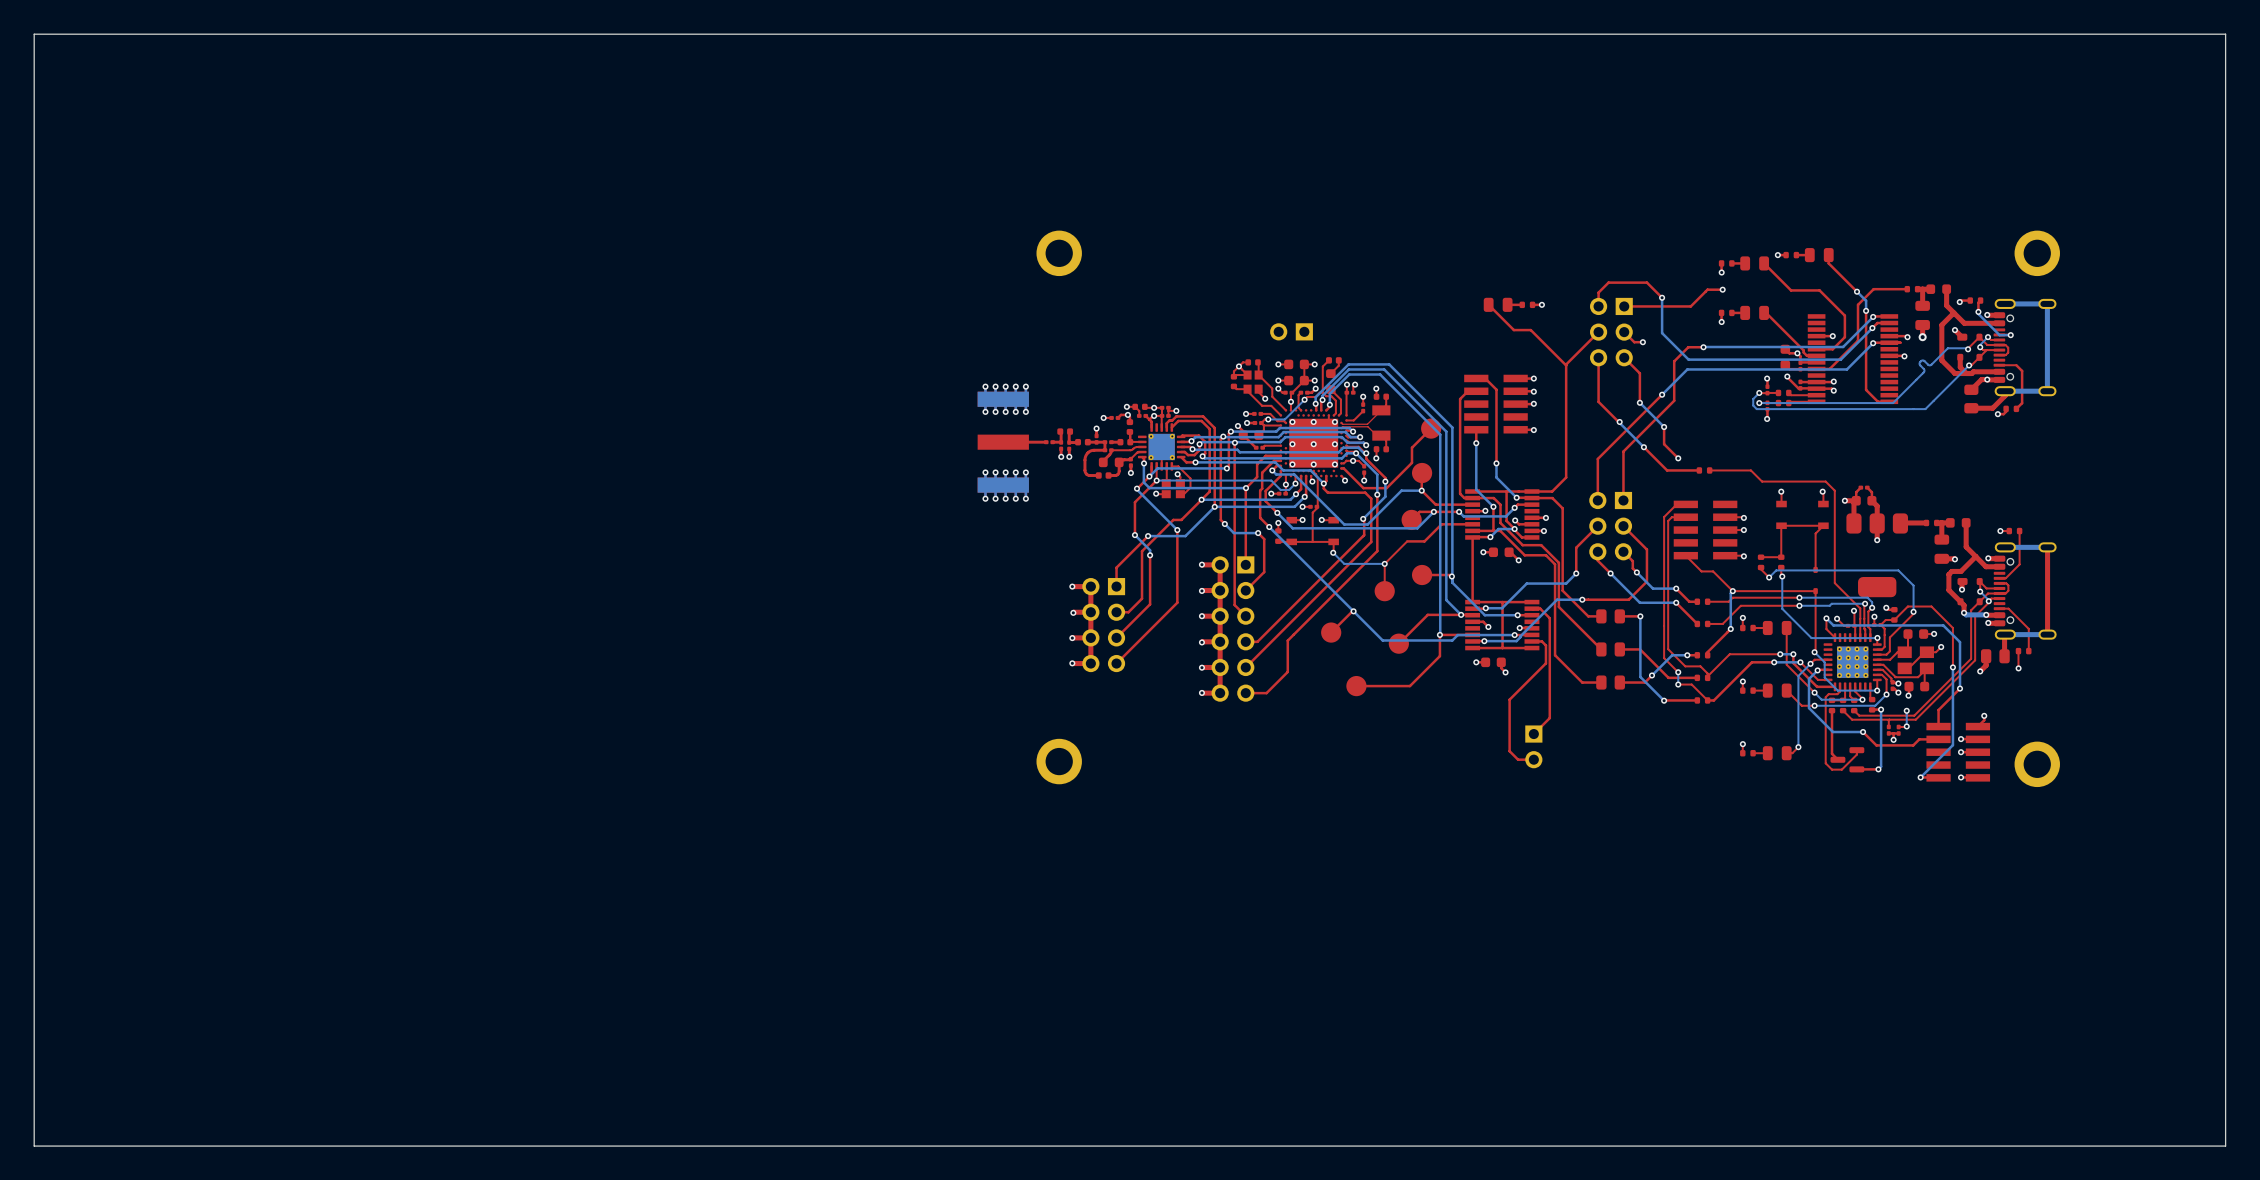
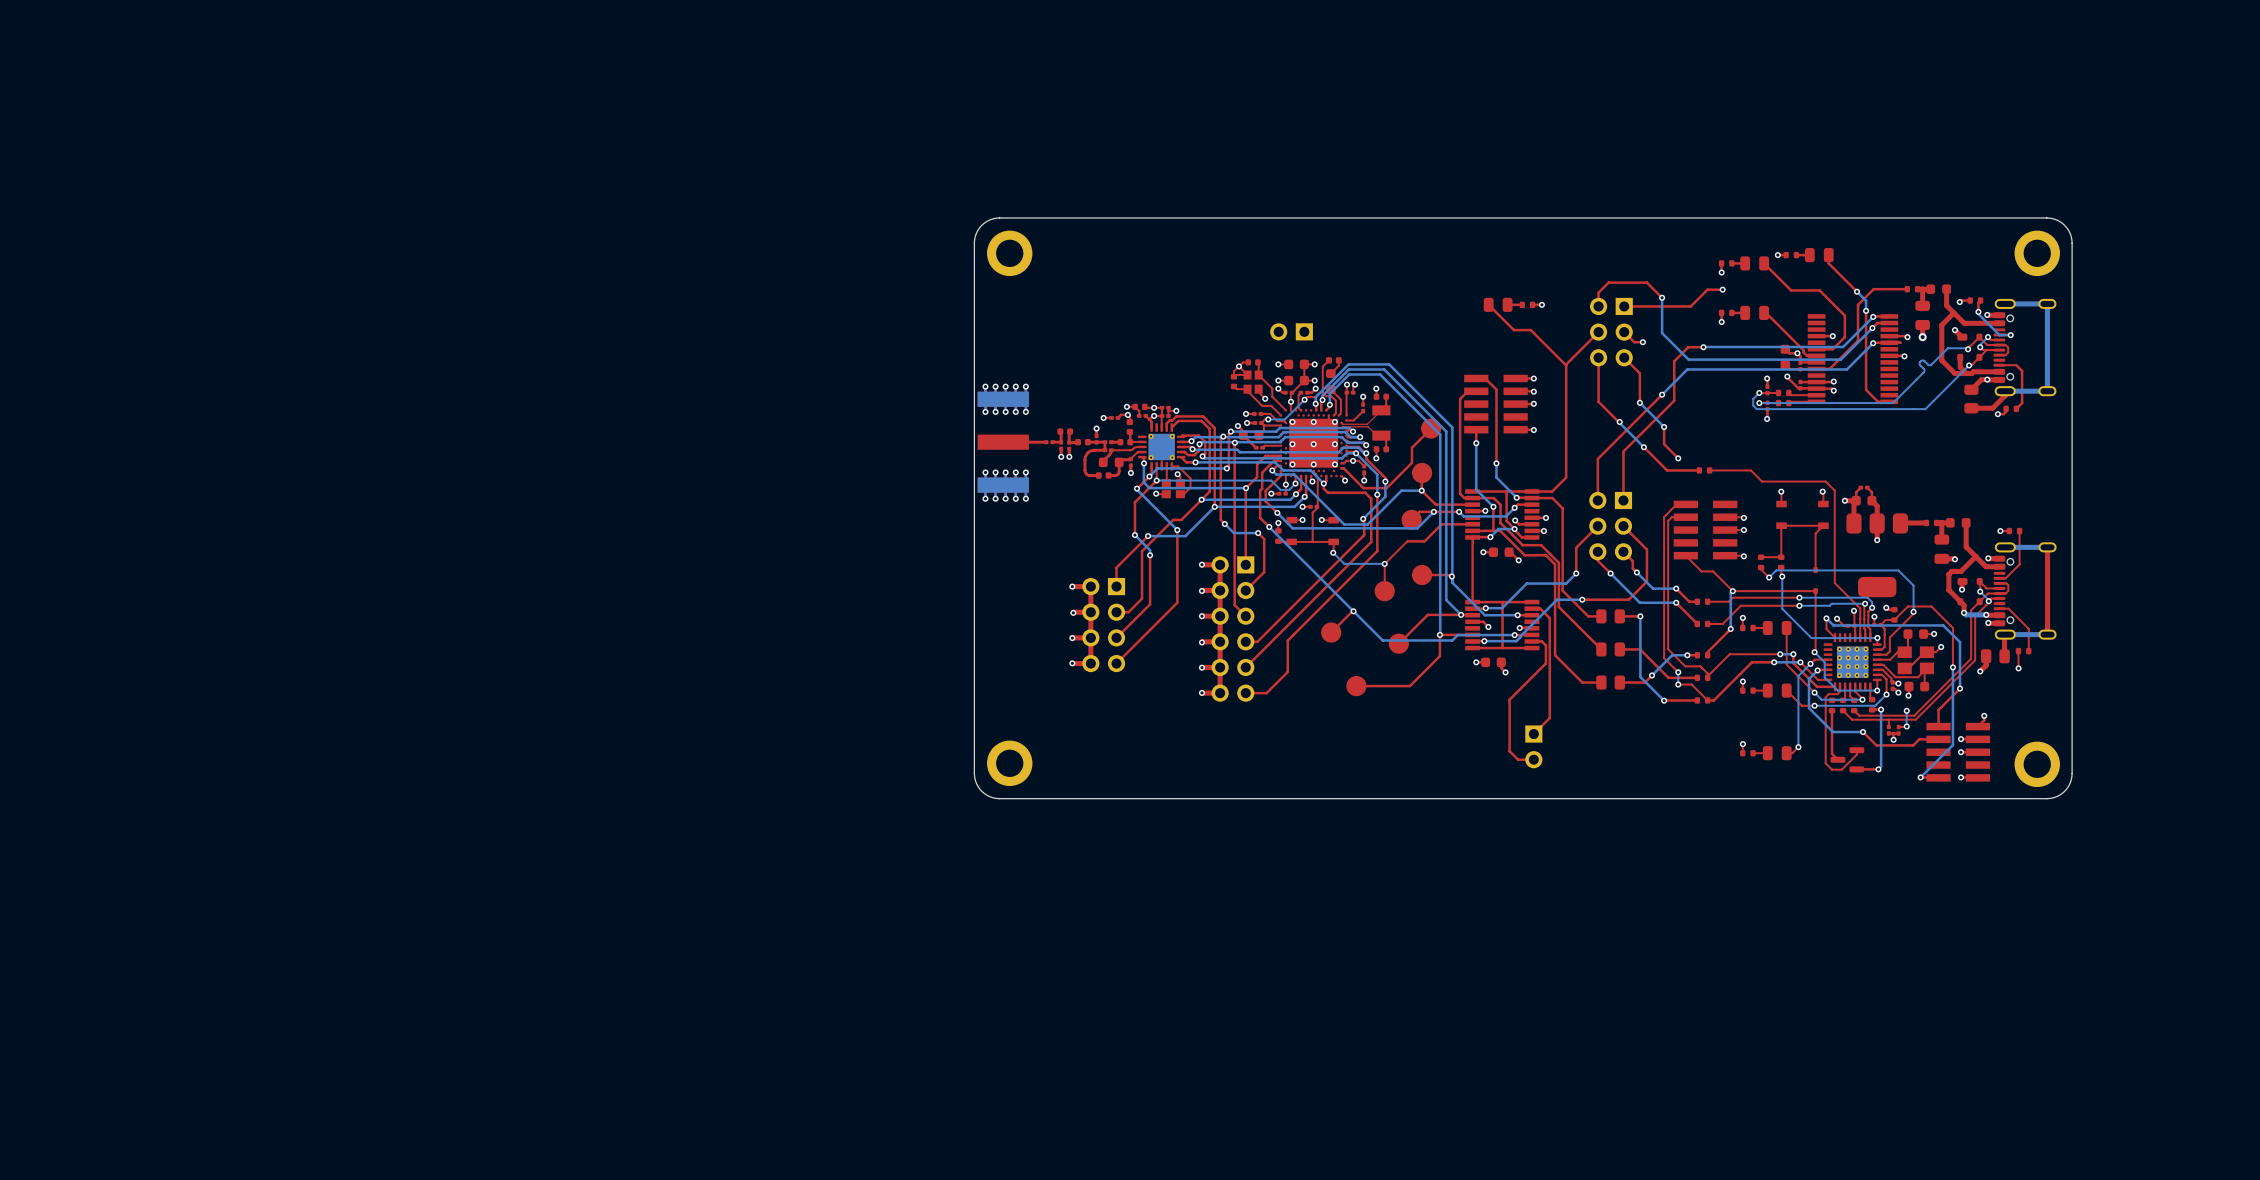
board edge: (2225, 34) (34, 34) (34, 1146) (2225, 1146) (2225, 34) -> none
board edge: none -> (2046, 217) (999, 217) (988, 220) (978, 229) (974, 243) (974, 773) (976, 784) (986, 794) (999, 798) (2046, 798) (2057, 796) (2068, 786) (2072, 773) (2072, 243) (2069, 232) (2064, 225) (2055, 219) (2046, 217)
part position: (1059, 253) -> (1009, 253)
part position: (1059, 761) -> (1009, 763)

